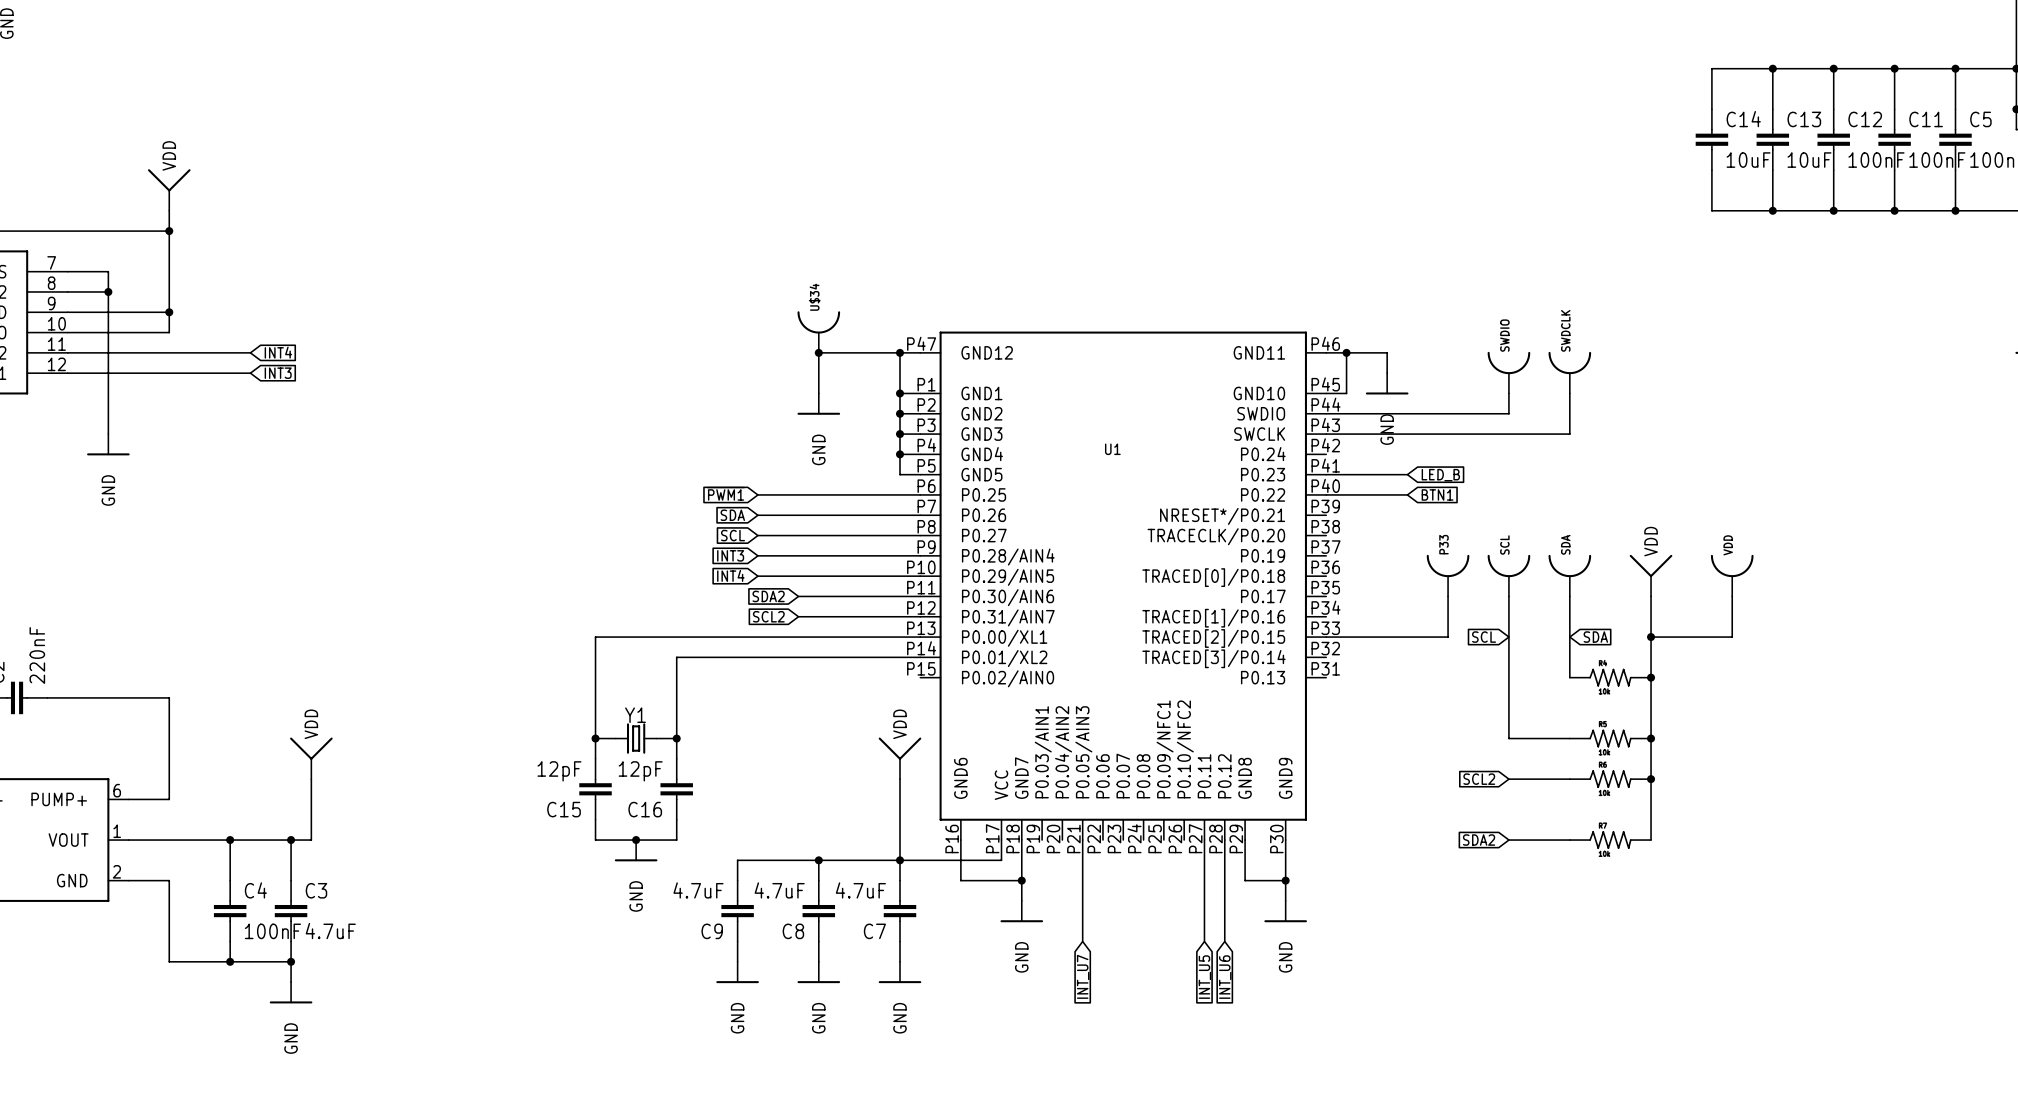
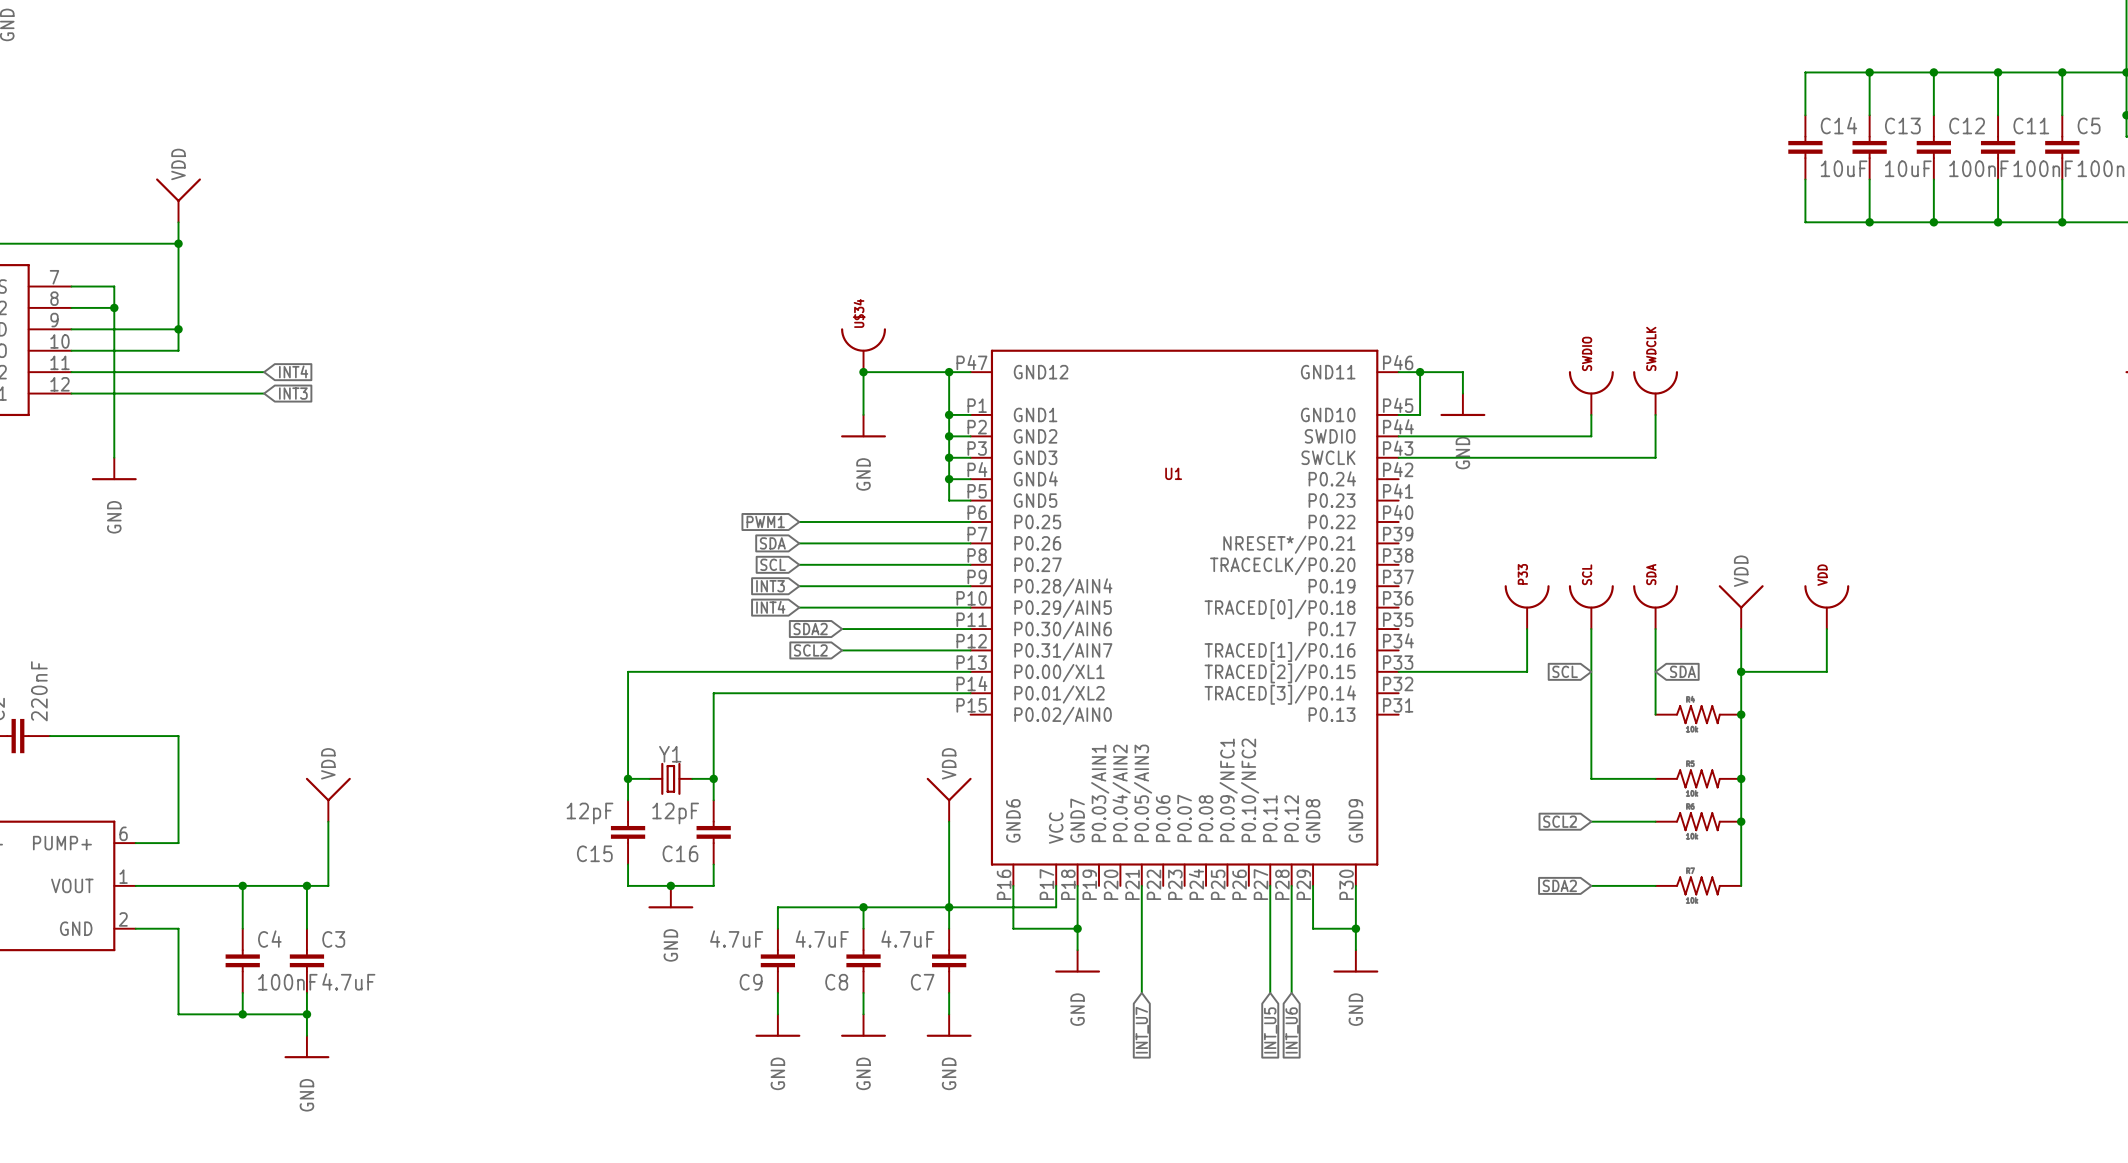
wire: (1326, 474) (1407, 474) -> none
global label: LED_B (1440, 475) -> none
wire: (1326, 494) (1407, 494) -> none
global label: BTN1 (1437, 494) -> none

